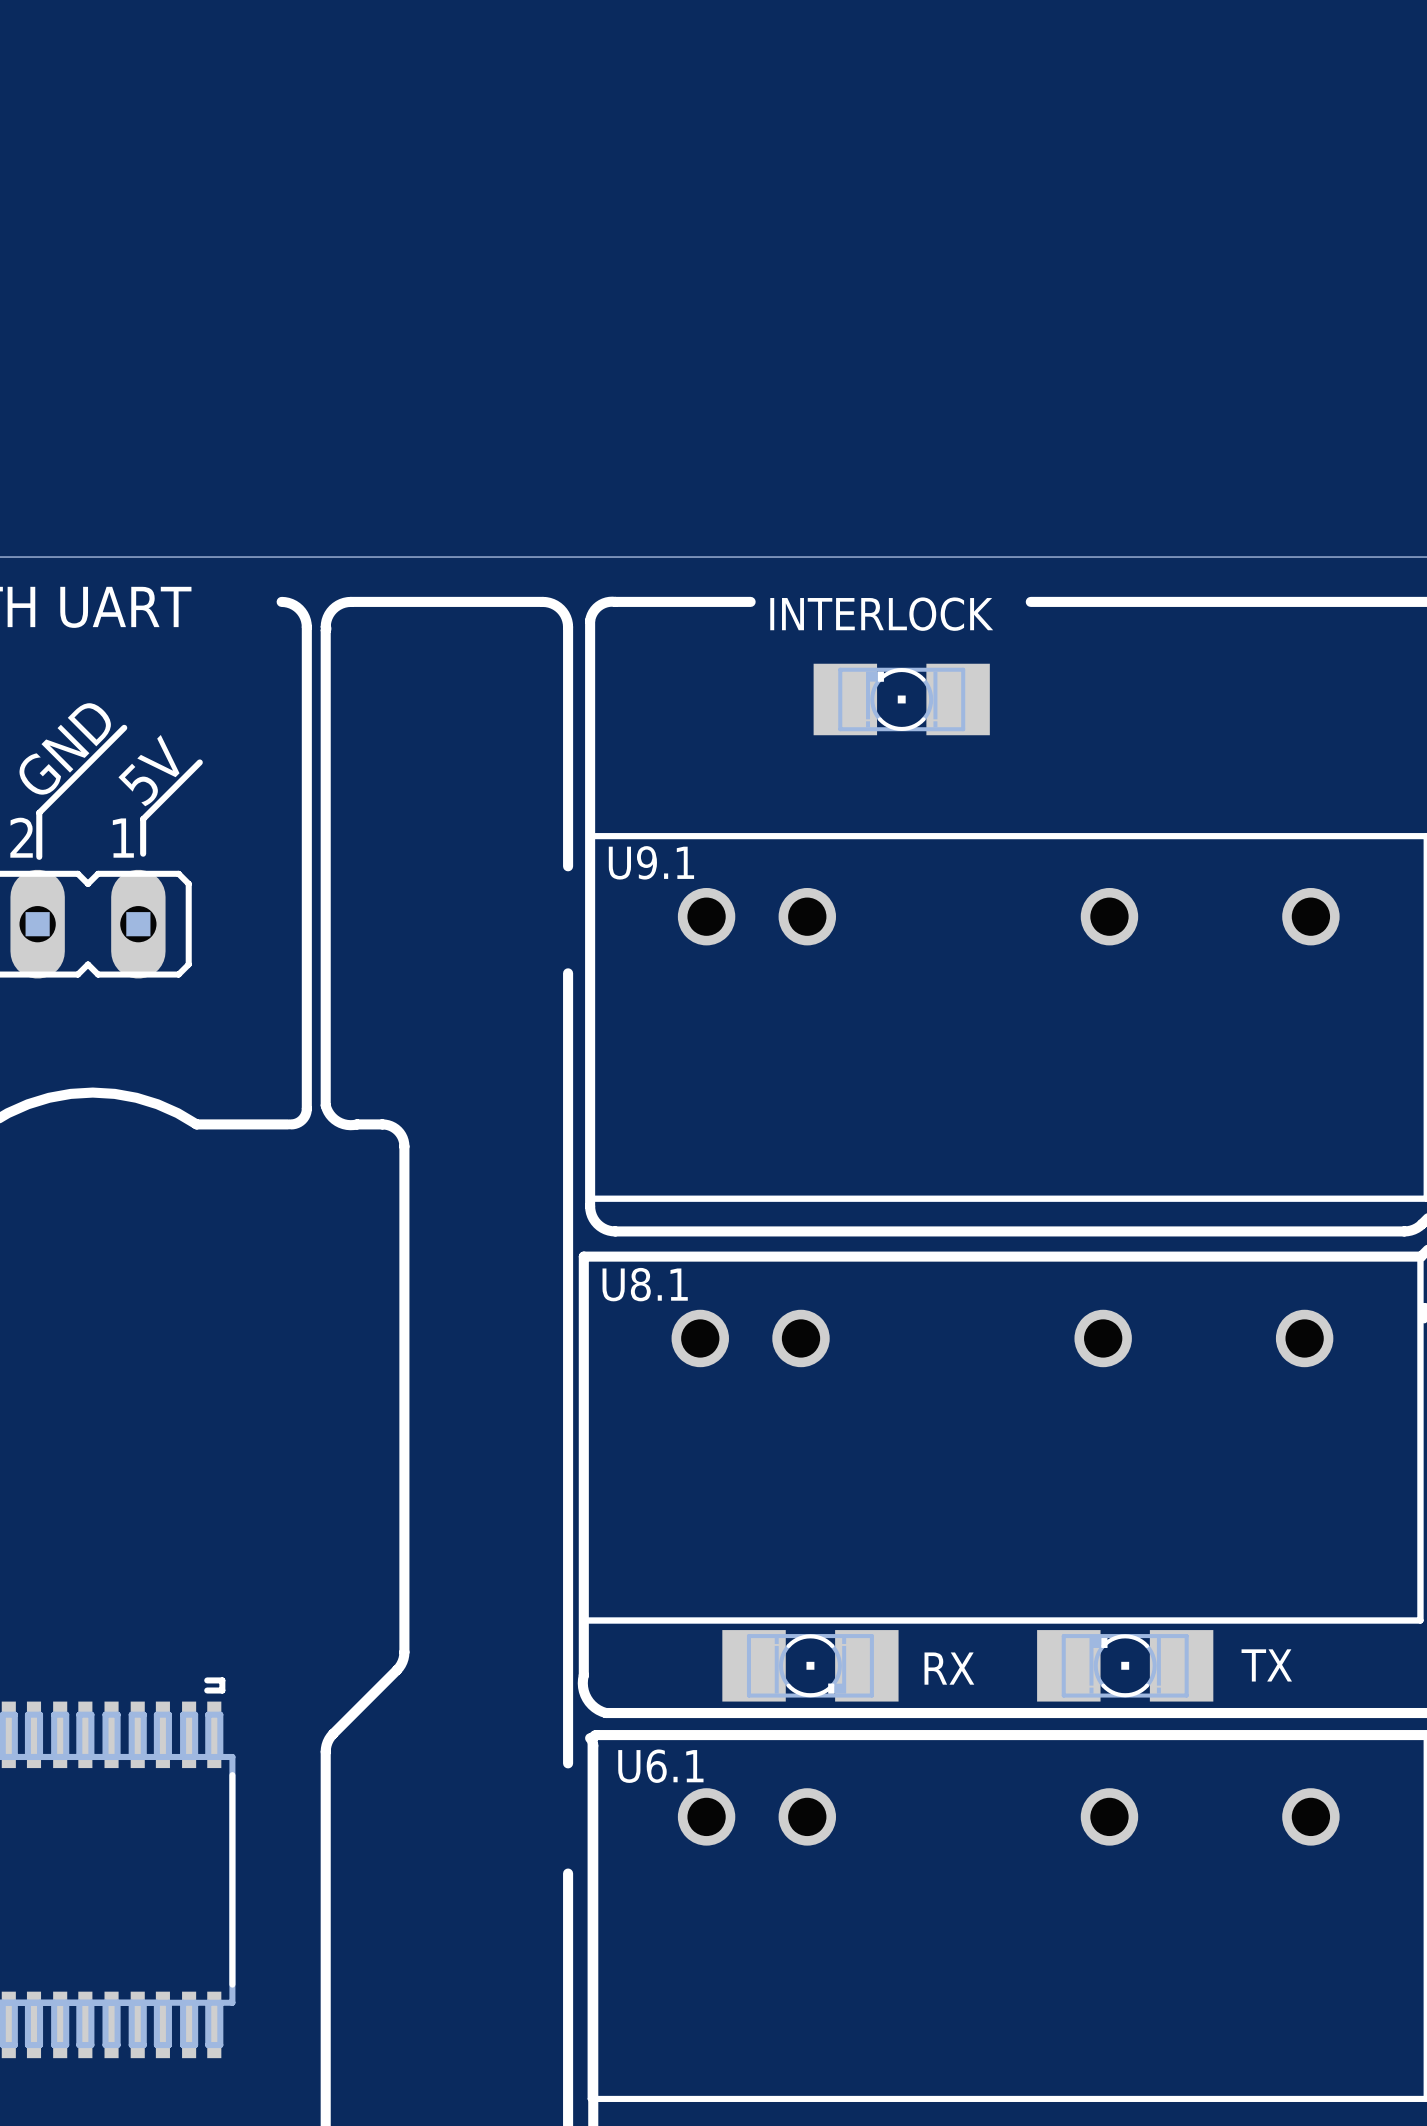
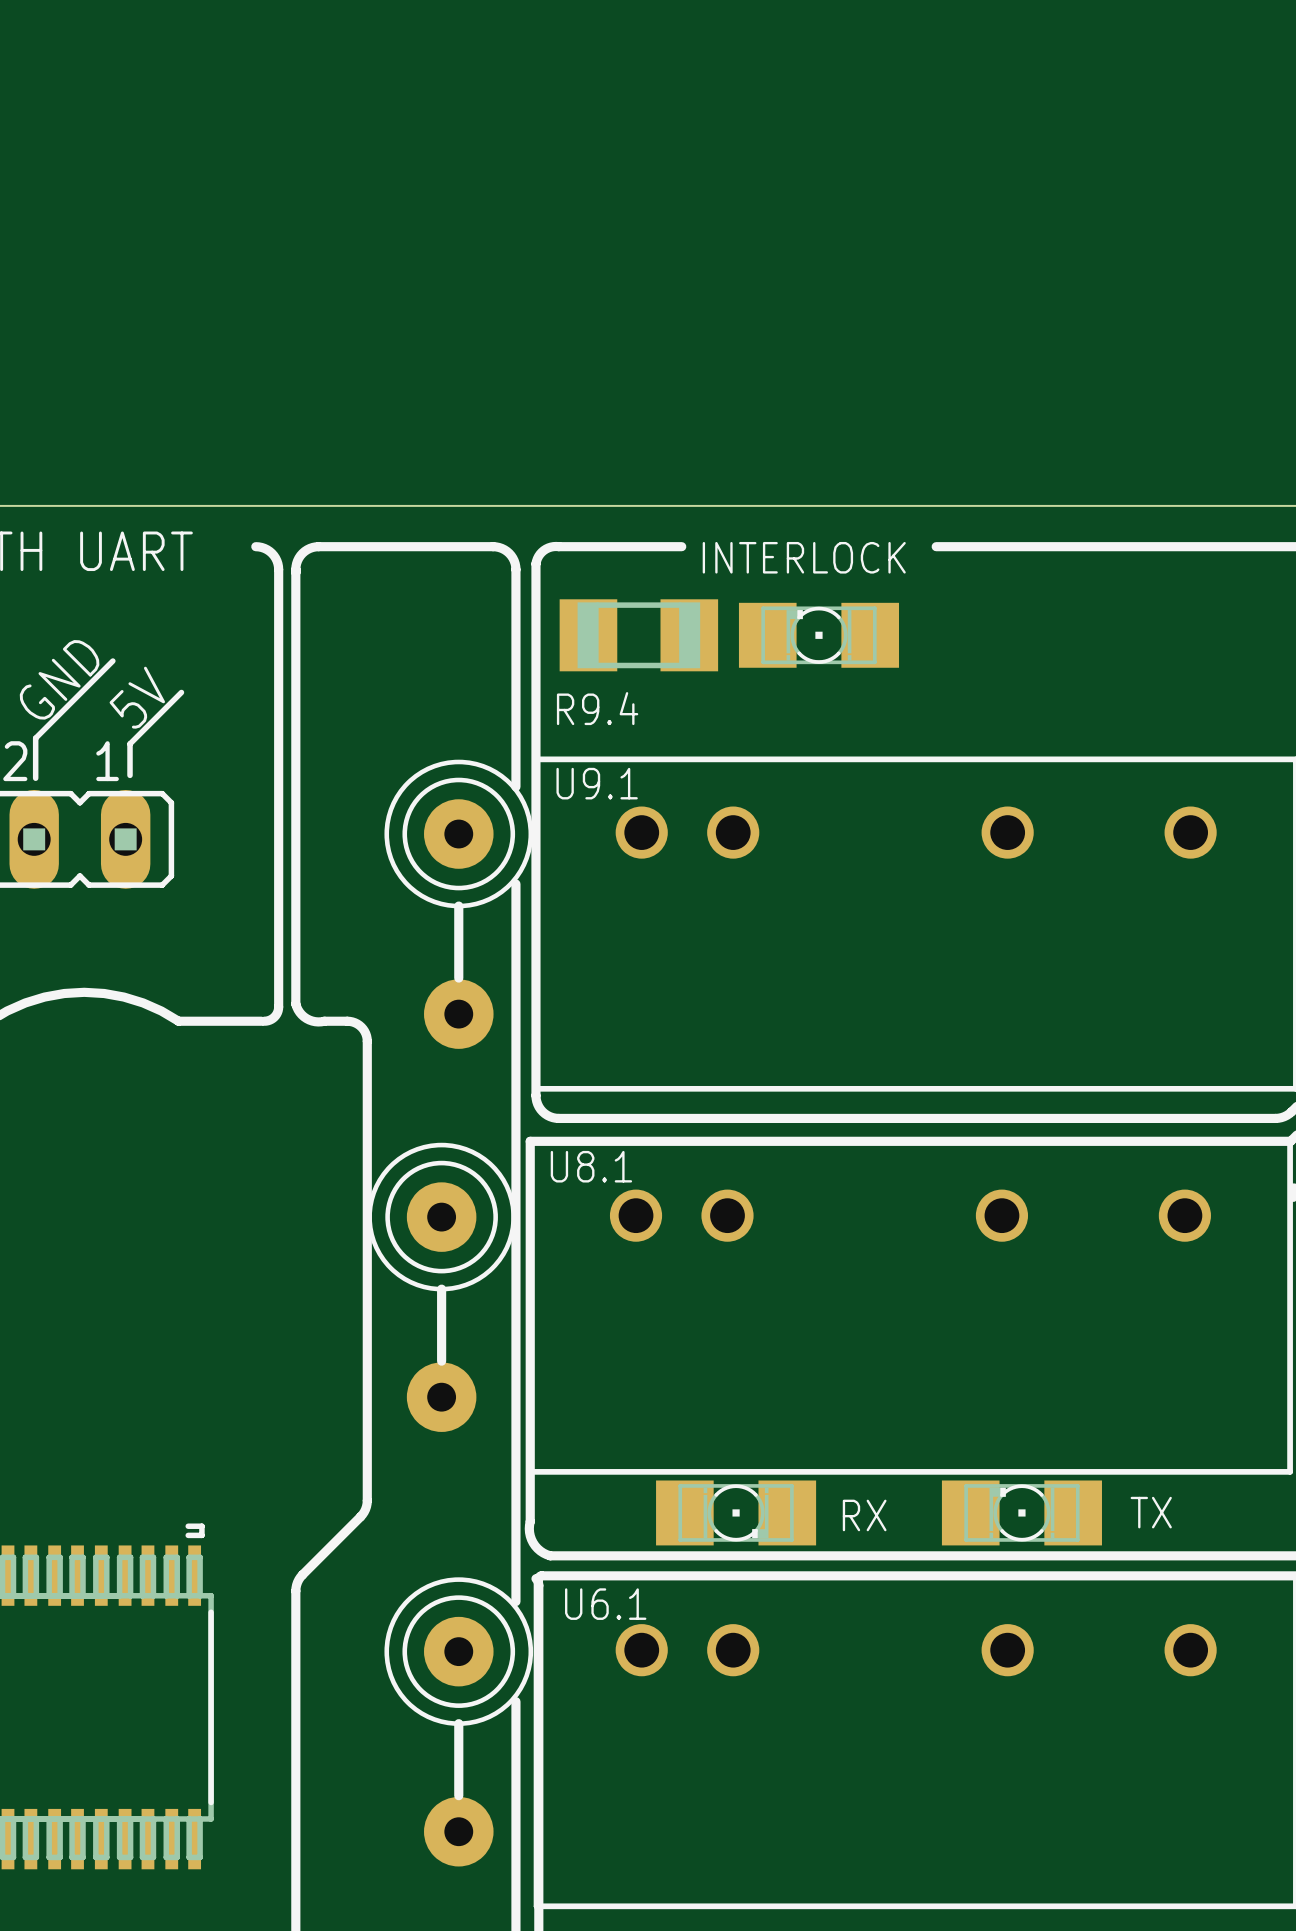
R9.4: none -> (638, 635)
part: none -> (458, 904)
part: none -> (441, 1287)
part: none -> (458, 1721)

